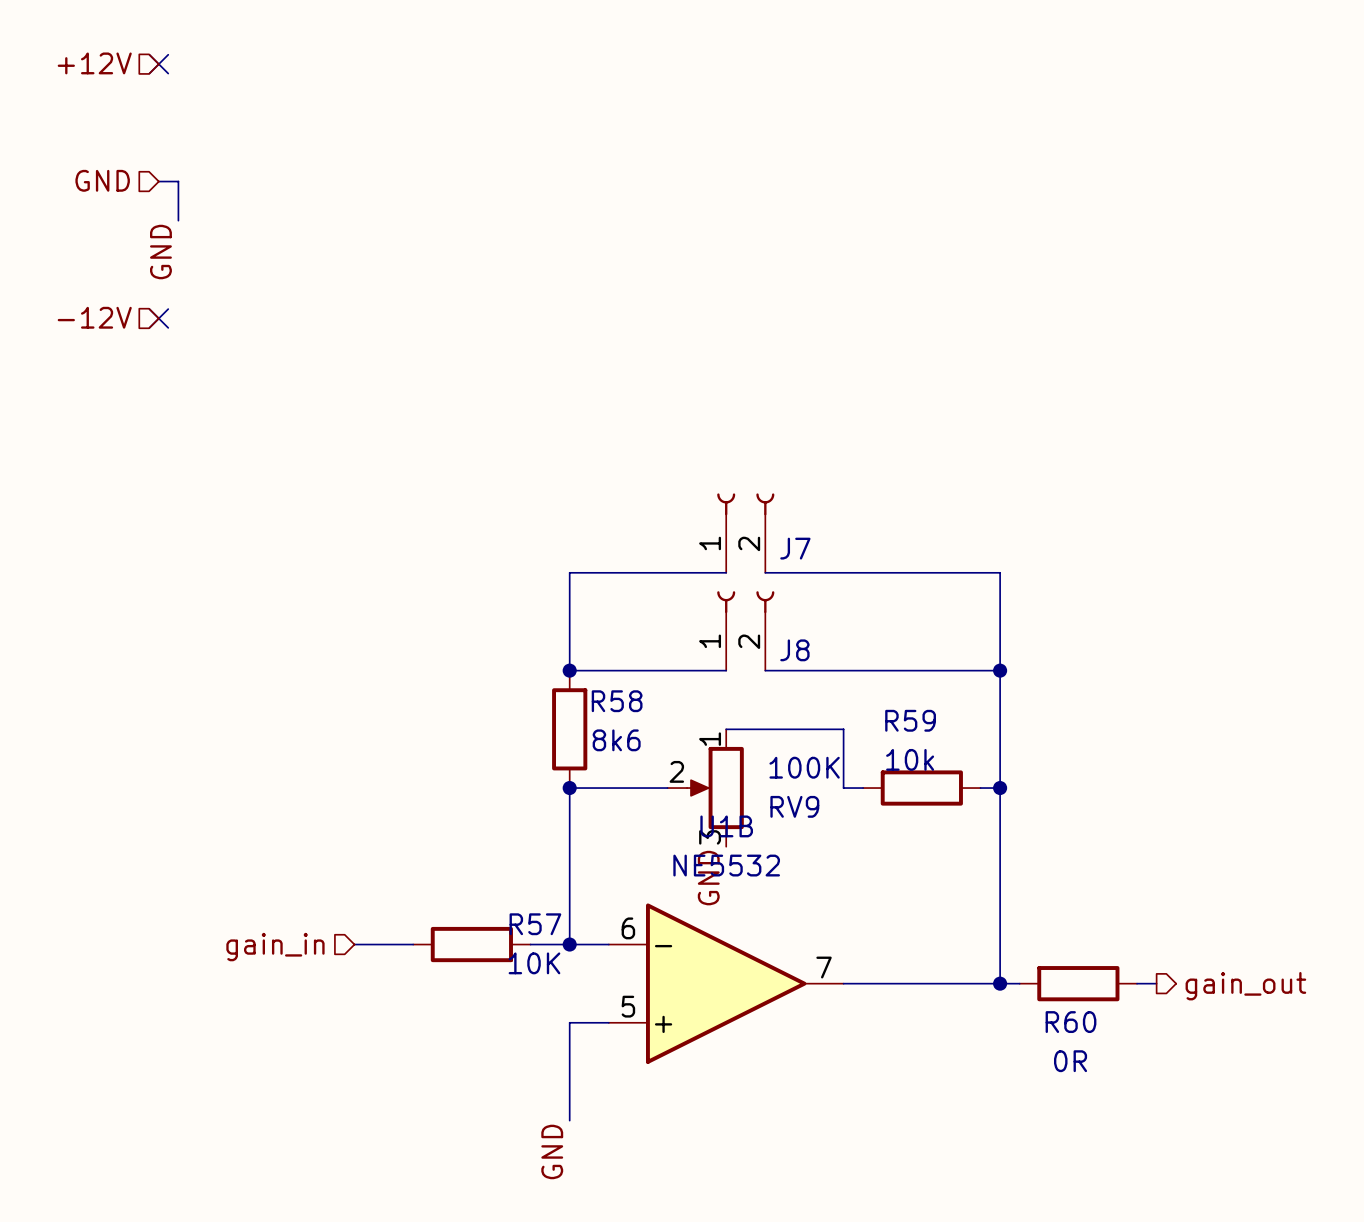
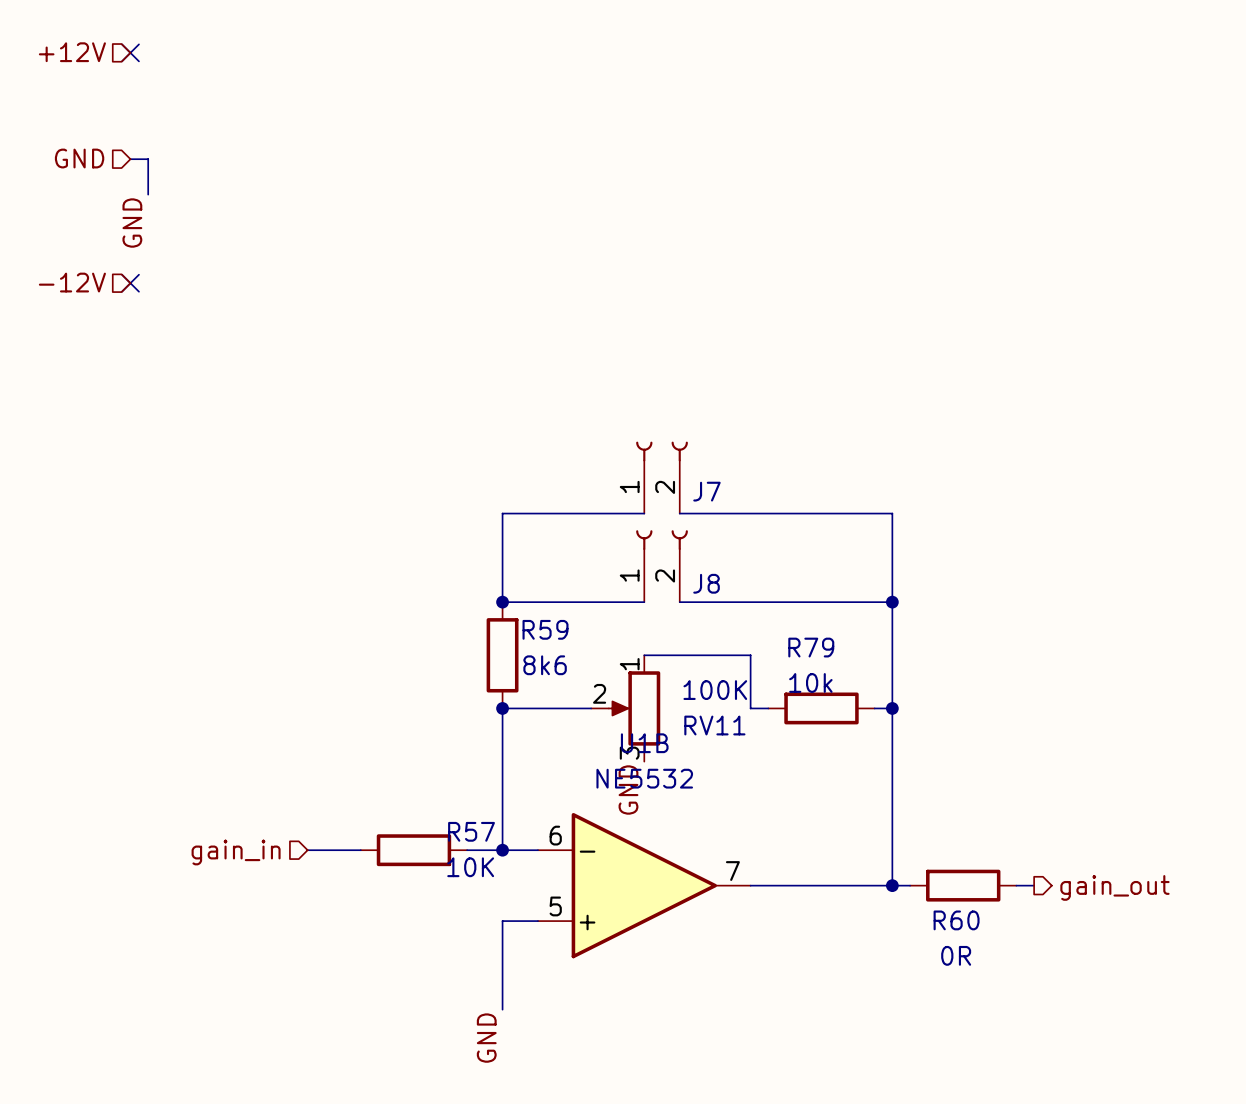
R58 name: R58 (617, 701) -> R59 (545, 629)
R59 name: R59 (910, 720) -> R79 (811, 647)
RV9 name: RV9 (794, 806) -> RV11 (714, 725)

